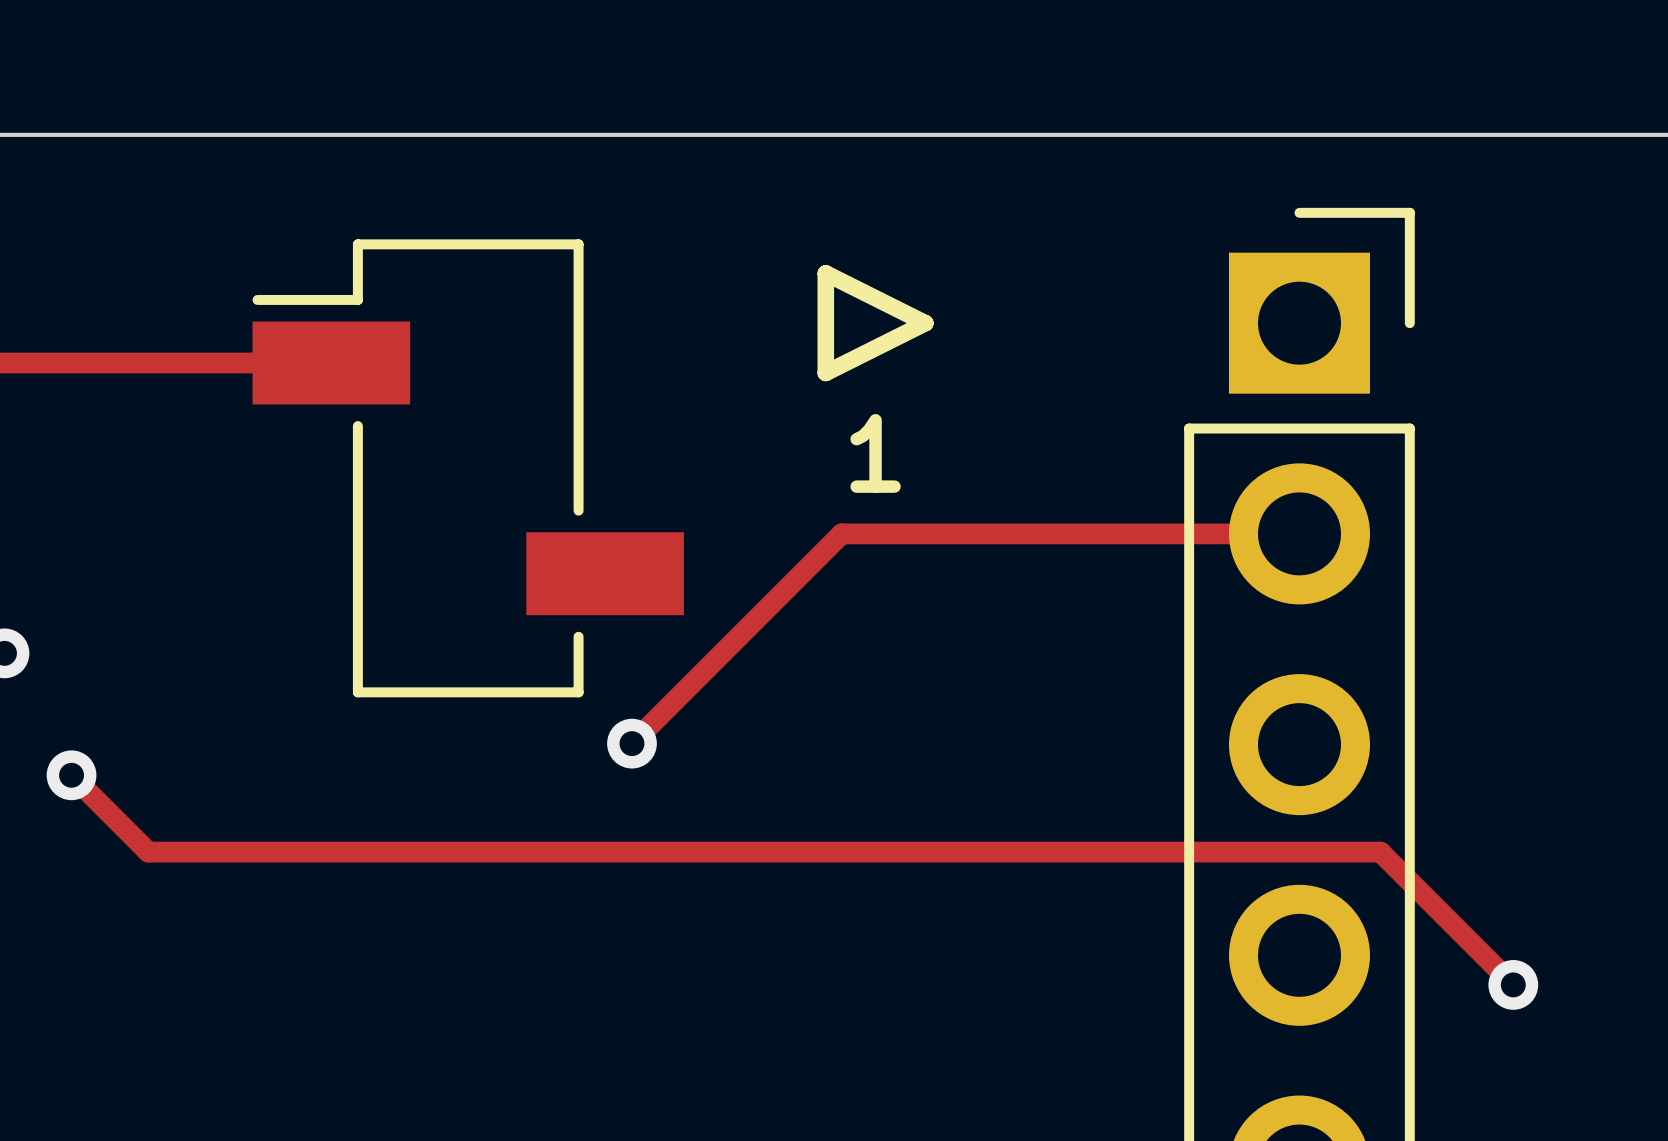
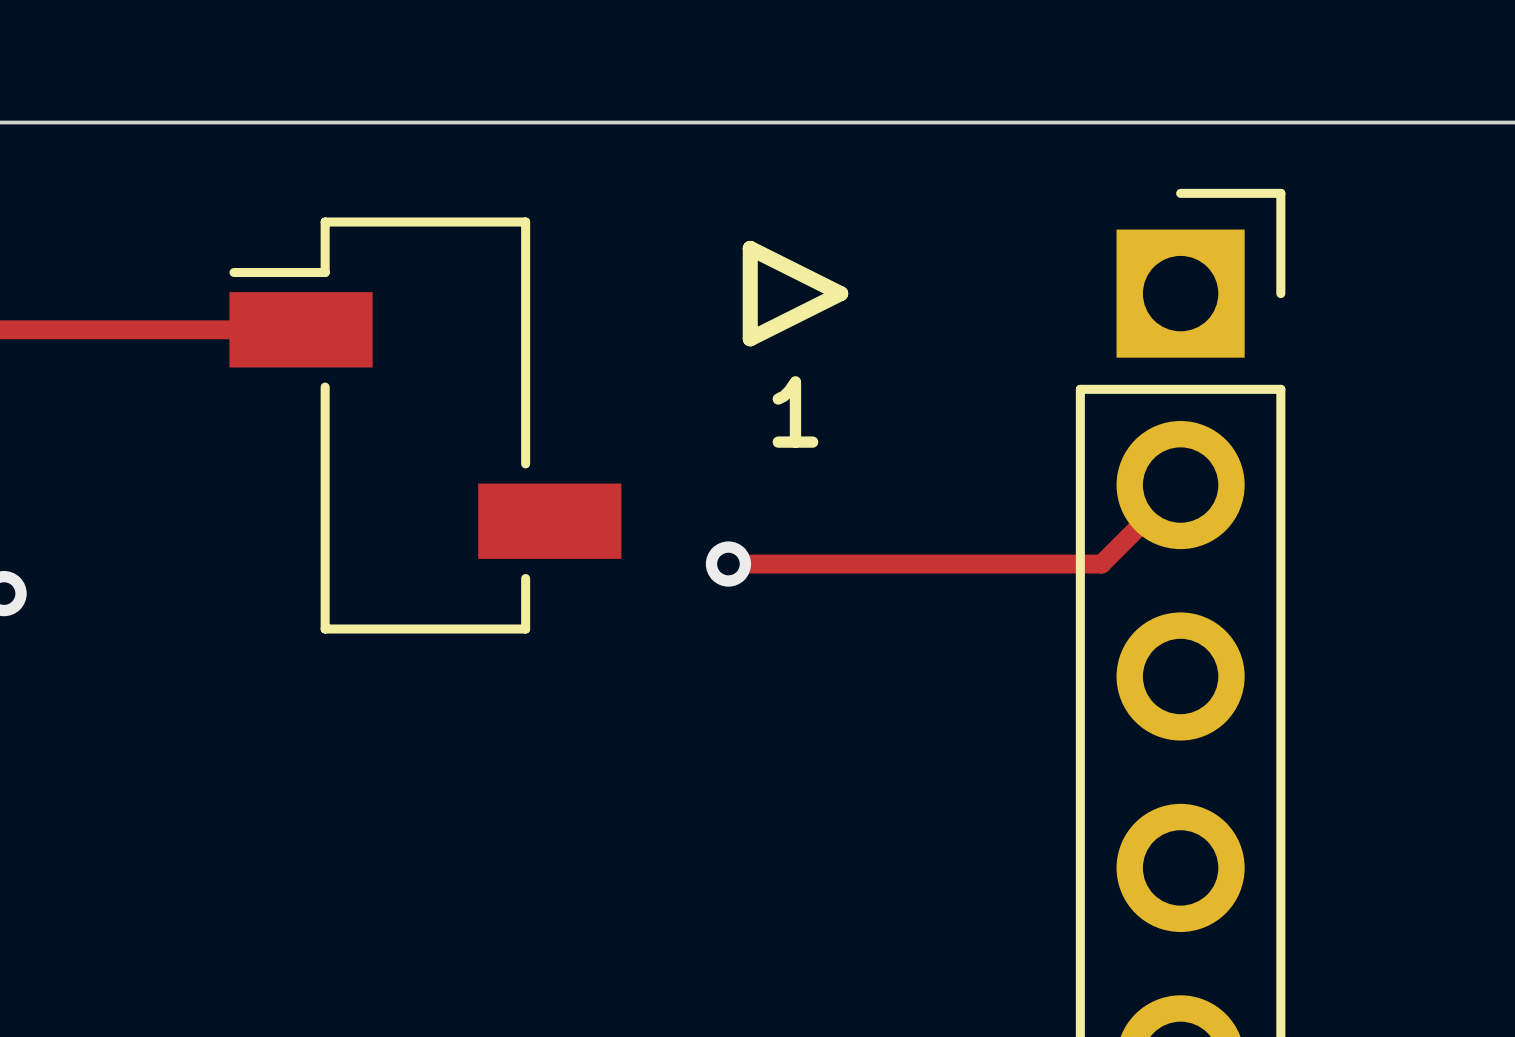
track: (1299, 533) (841, 533) (631, 743) -> (1180, 485) (1101, 564) (728, 564)
via position: (631, 743) -> (728, 564)
track: (71, 775) (148, 852) (1380, 852) (1513, 984) -> none
via: (71, 775) -> none
via: (1513, 984) -> none

